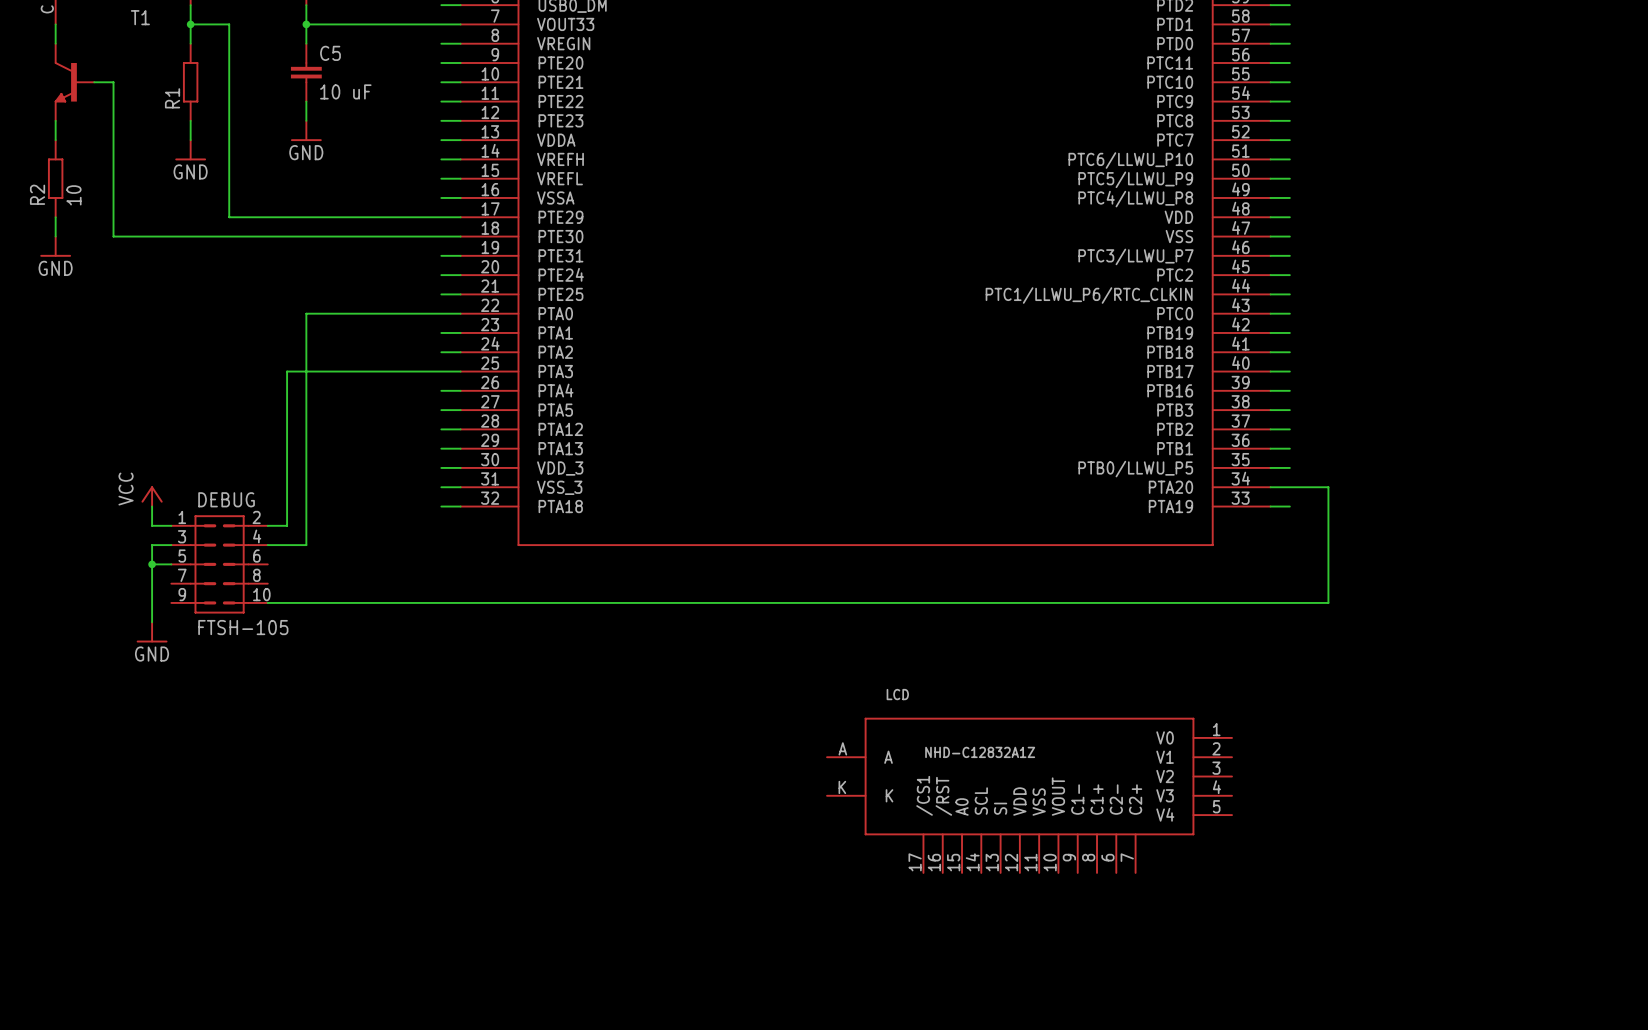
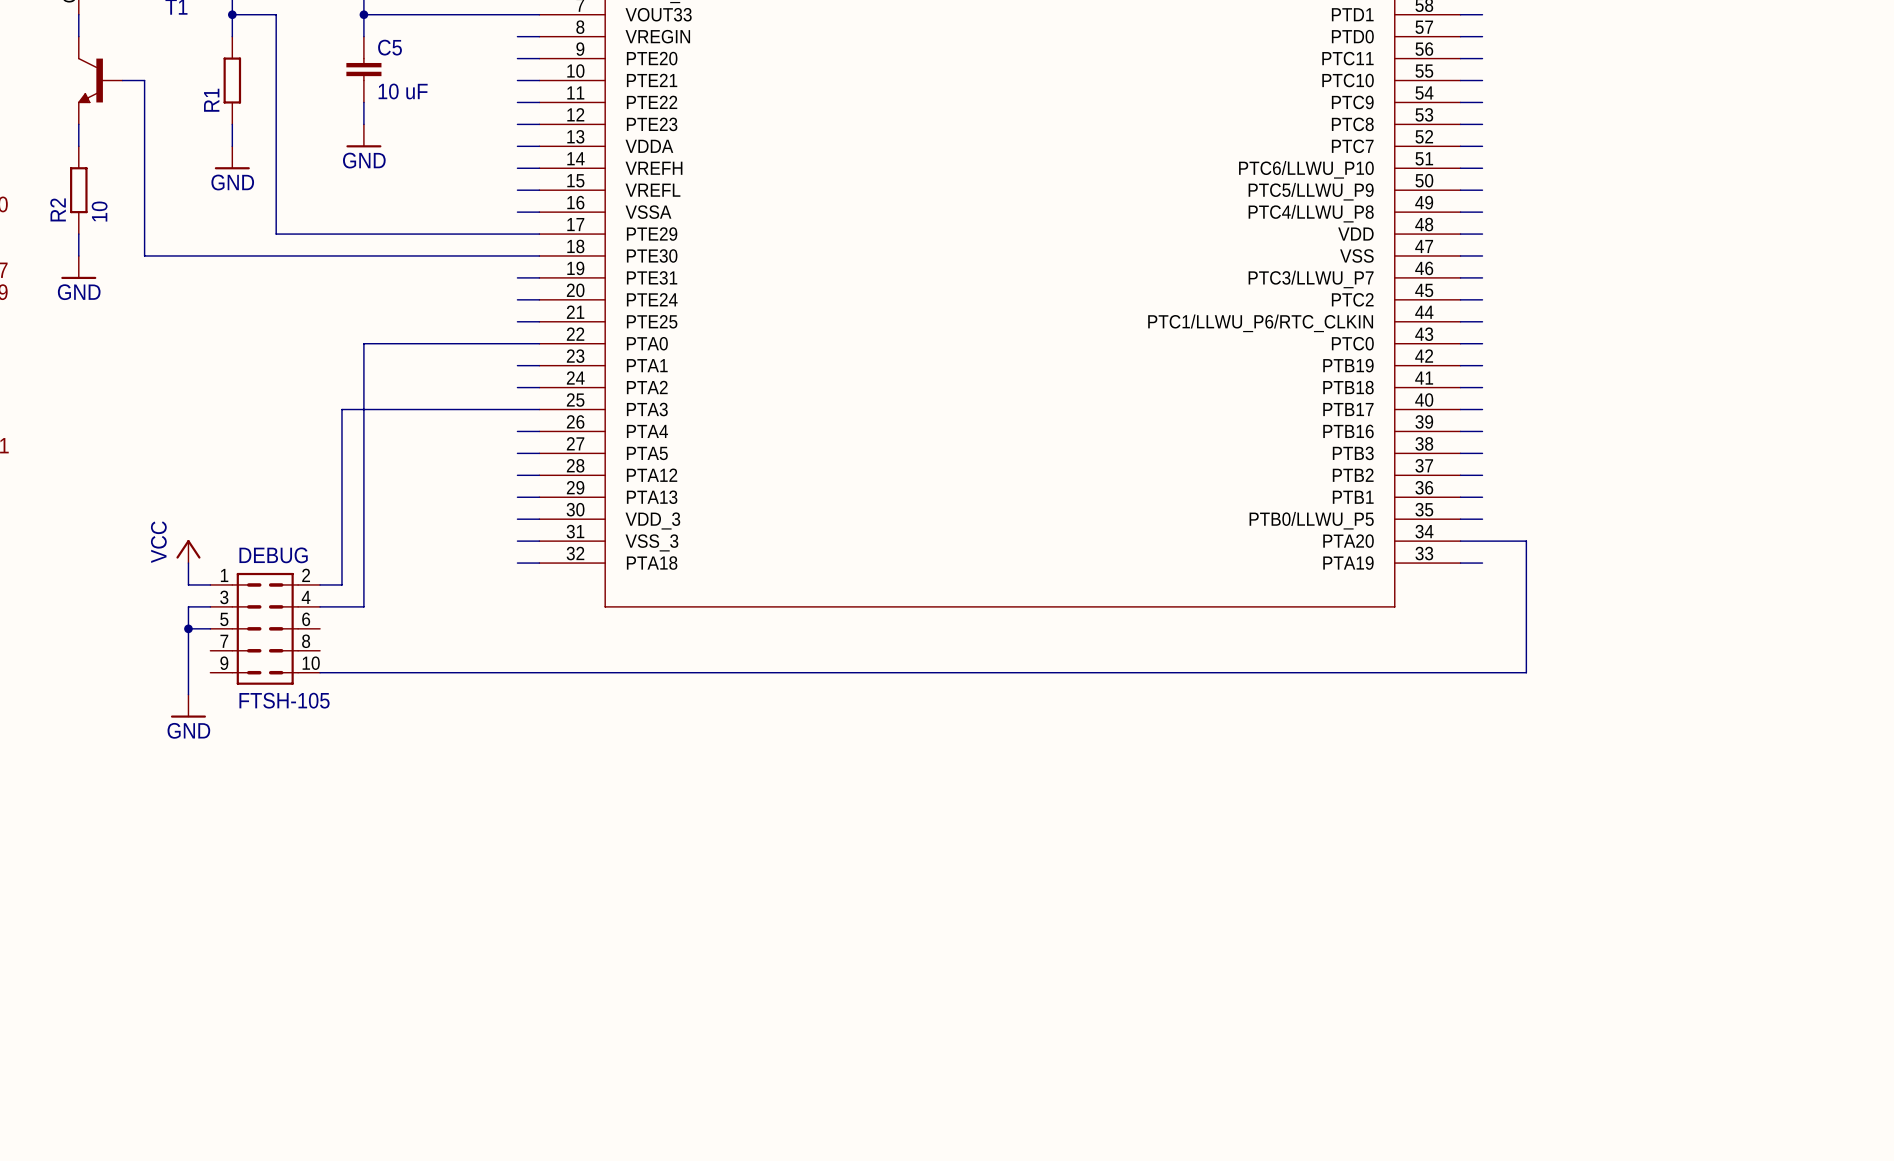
LCD: NHD-C12832A1Z (1029, 795) -> none

